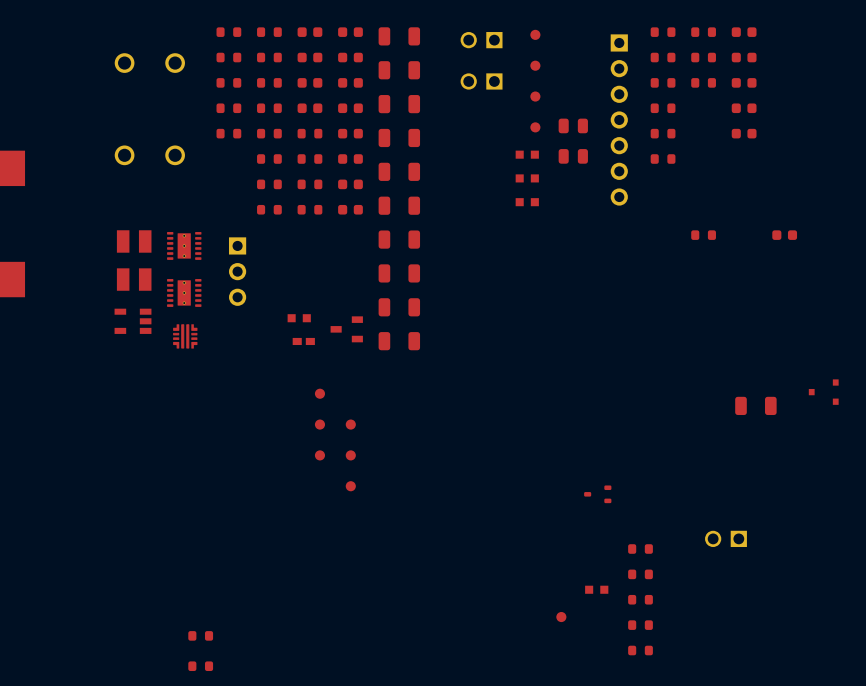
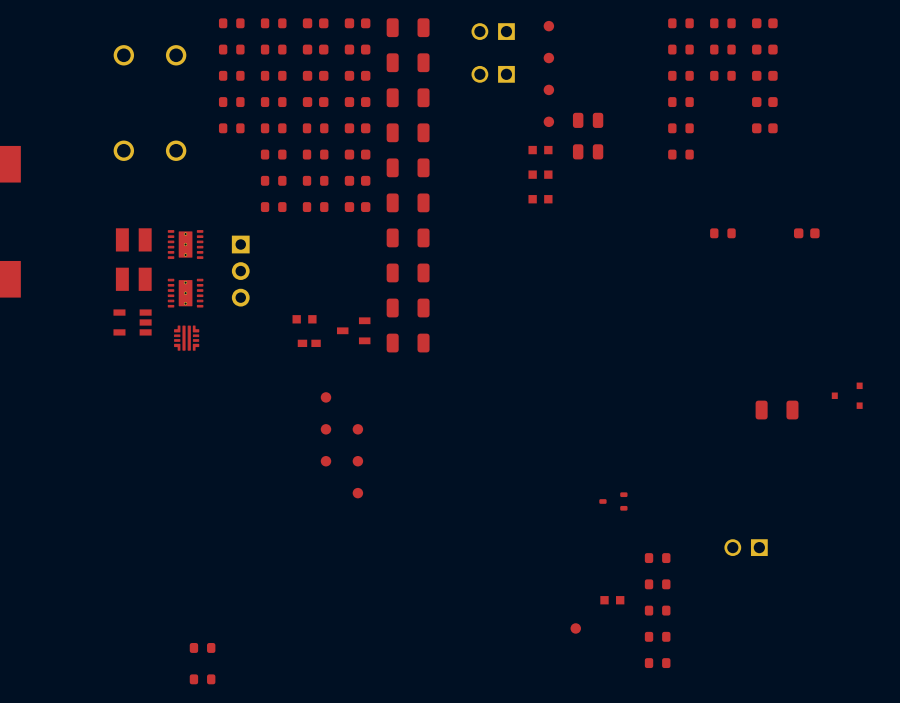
part: (619, 119) -> none

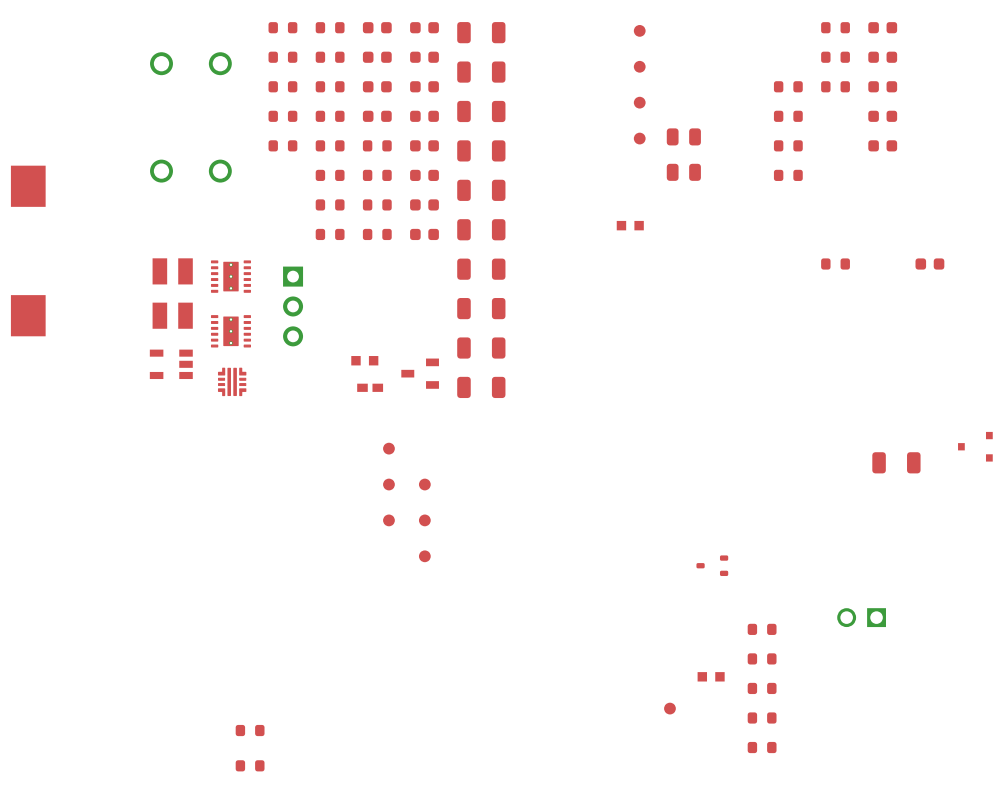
part: (680, 23) -> none
part: (493, 31) -> none
part: (680, 49) -> none
part: (493, 74) -> none
part: (540, 150) -> none
part: (540, 174) -> none

